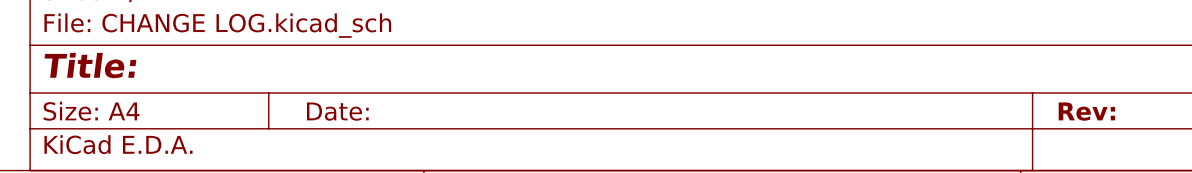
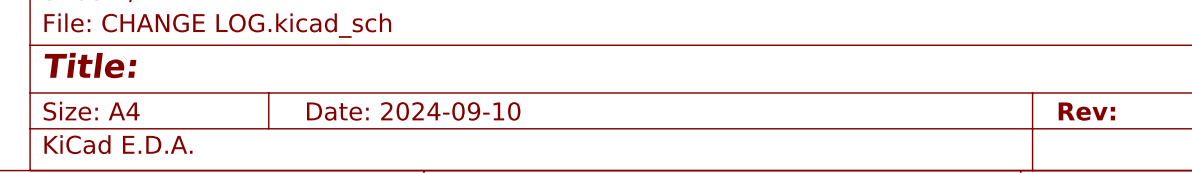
title block: Date: (337, 111) -> Date: 2024-09-10 (413, 111)

